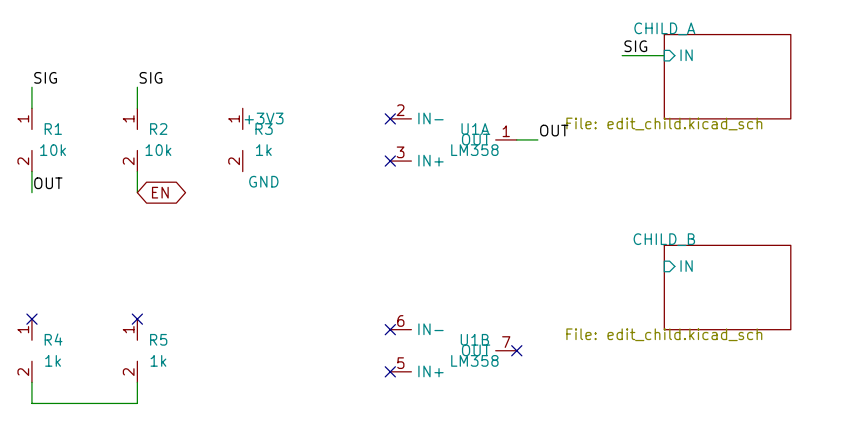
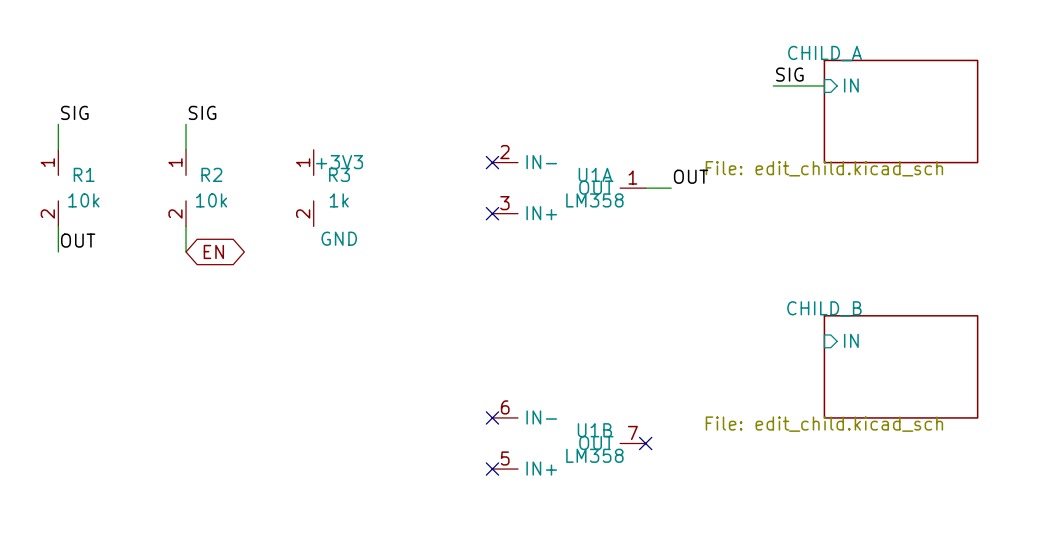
no-connect mark: (31, 319) -> none
no-connect mark: (137, 319) -> none
R4: 1k (31, 350) -> none
R5: 1k (137, 350) -> none
wire: (31, 382) (31, 403) (137, 403) (137, 382) -> none

